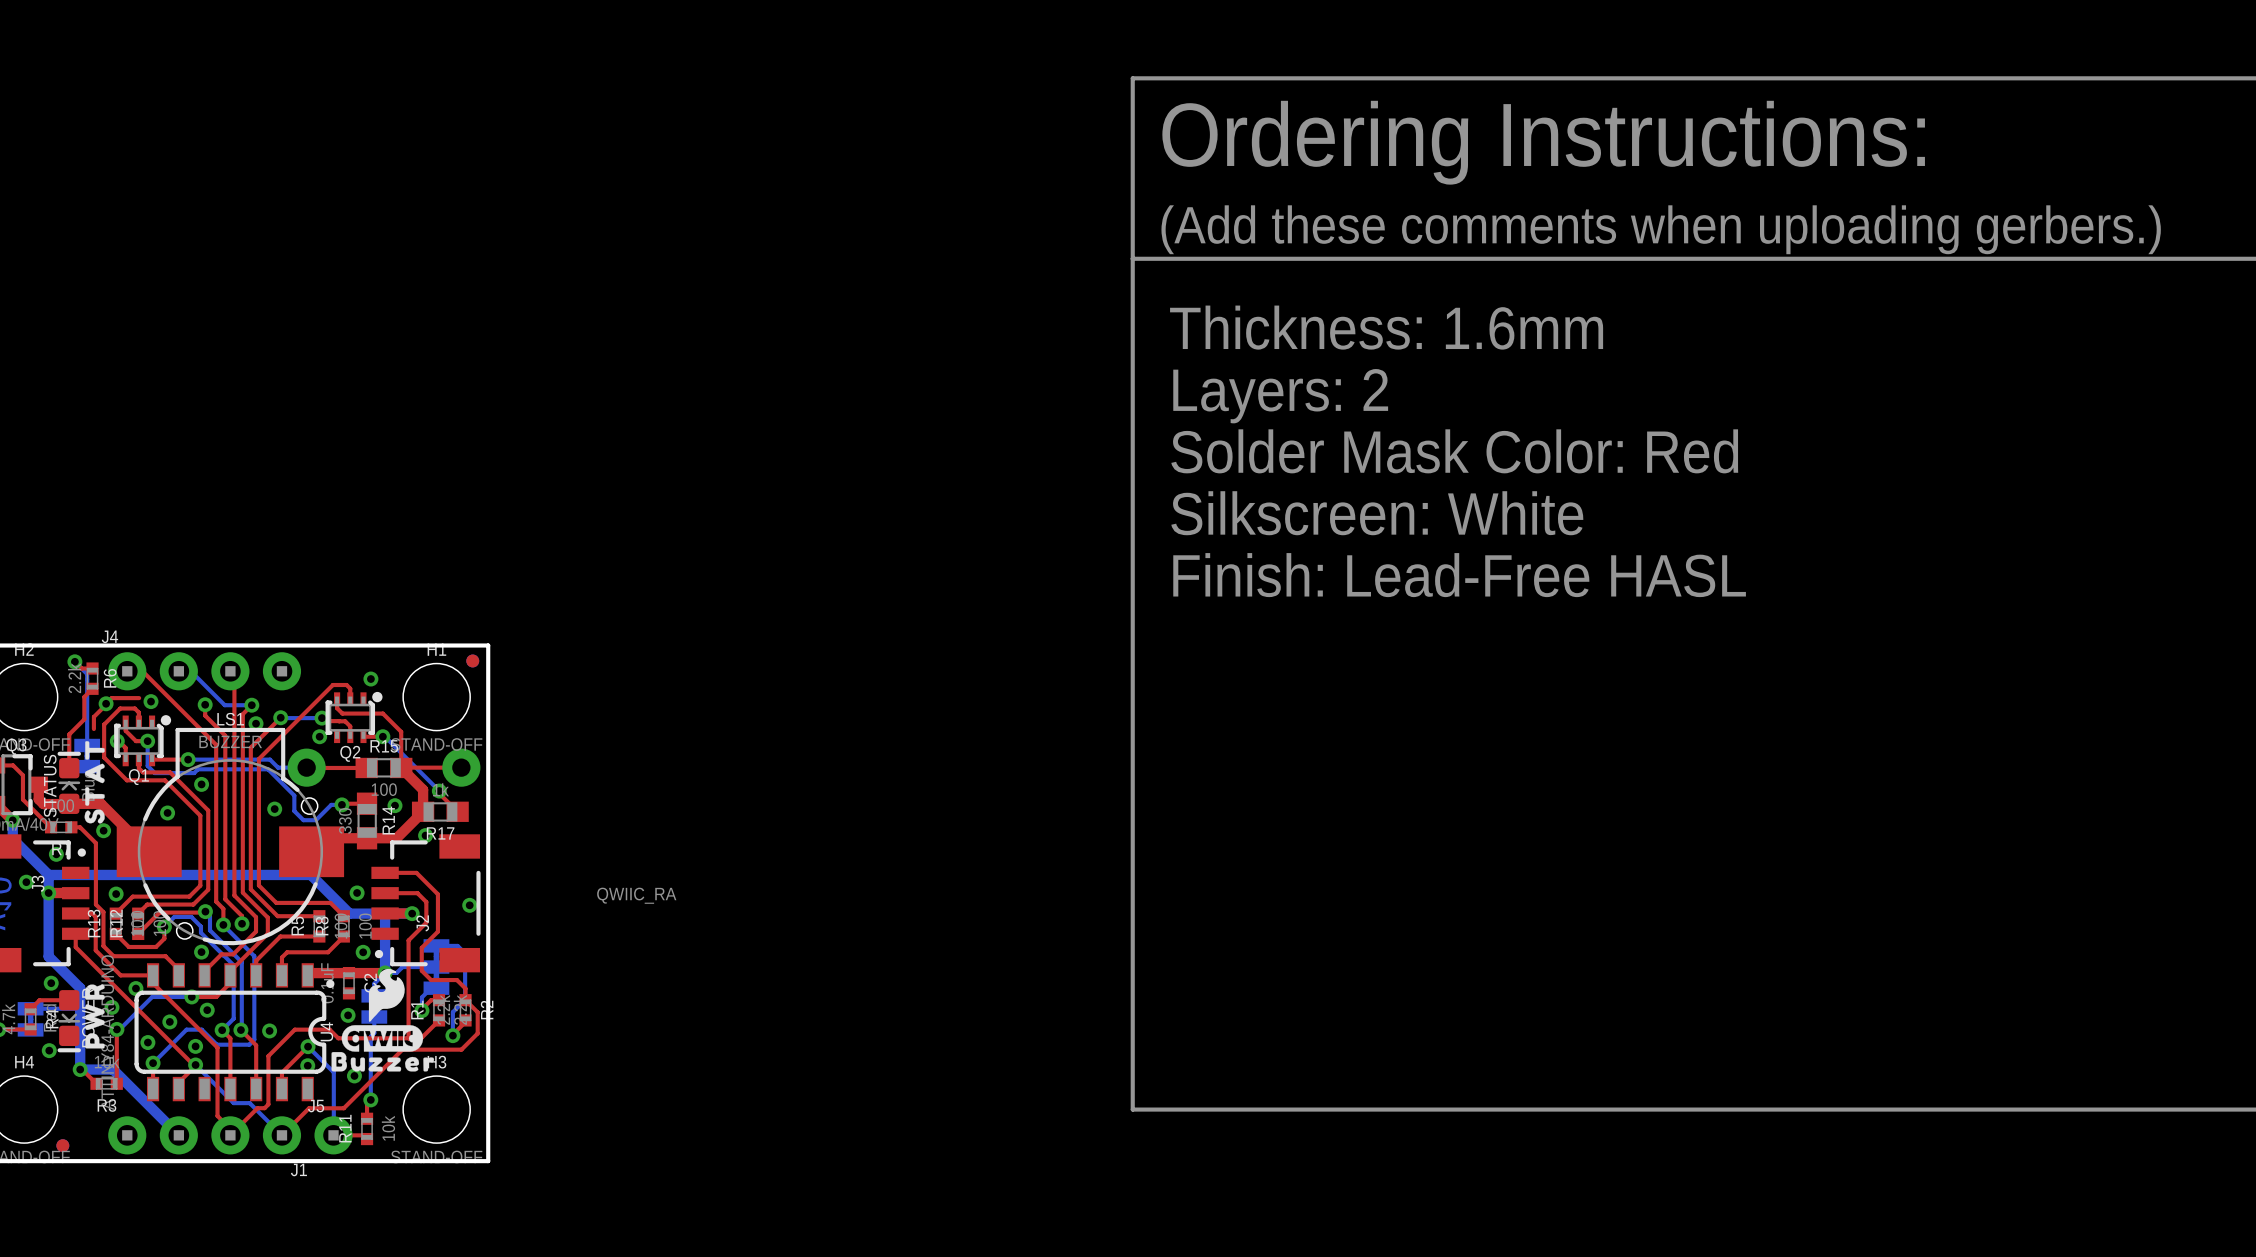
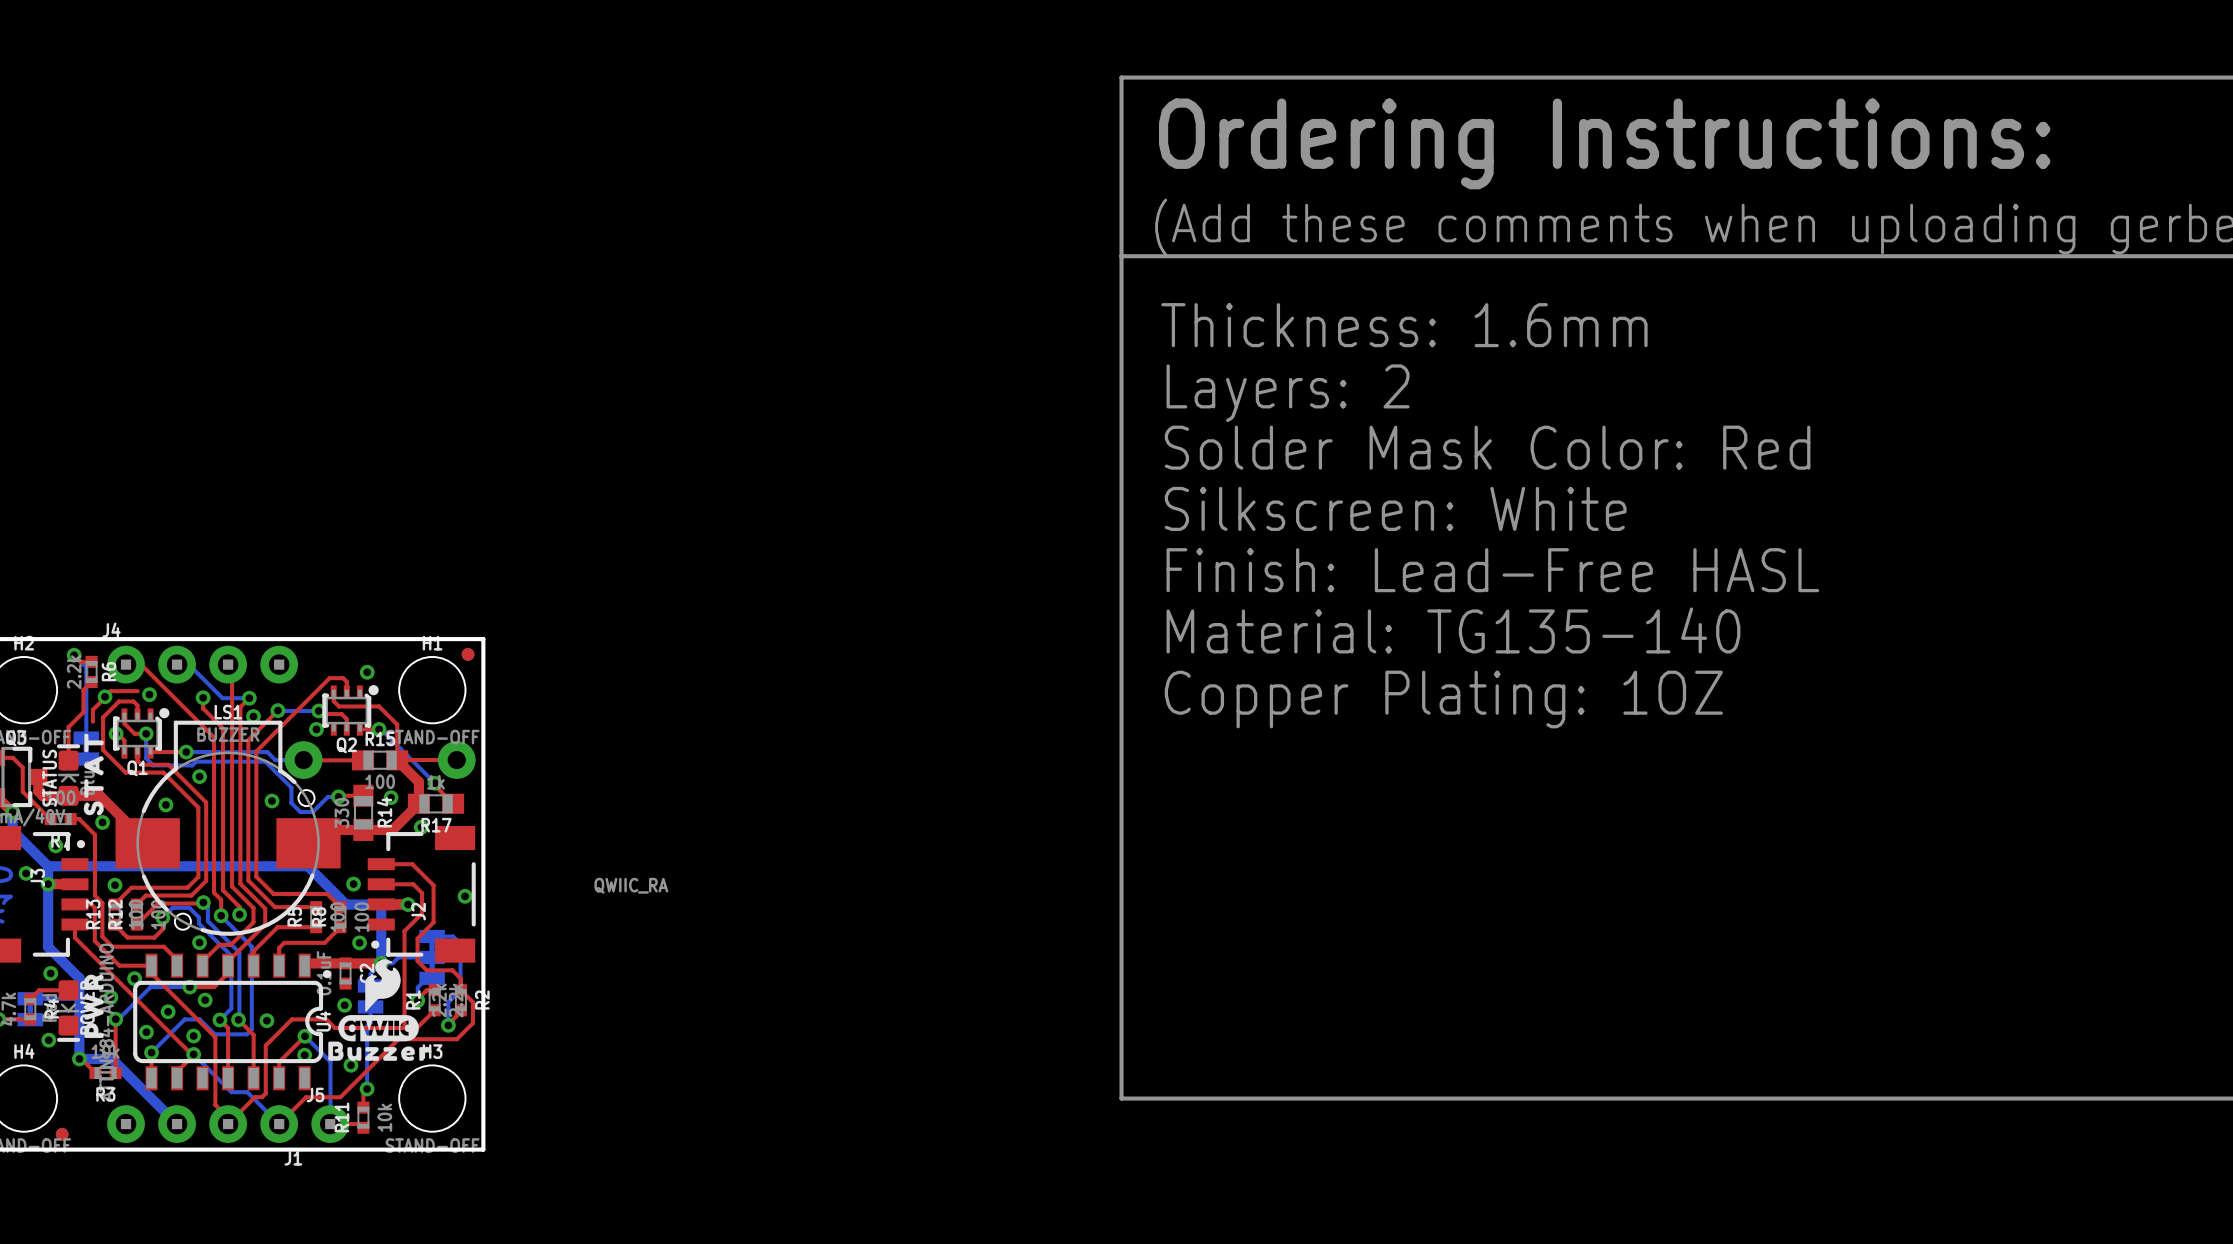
text: none -> Material: TG135-140 (1453, 630)
text: none -> Copper Plating: 1OZ (1443, 699)

